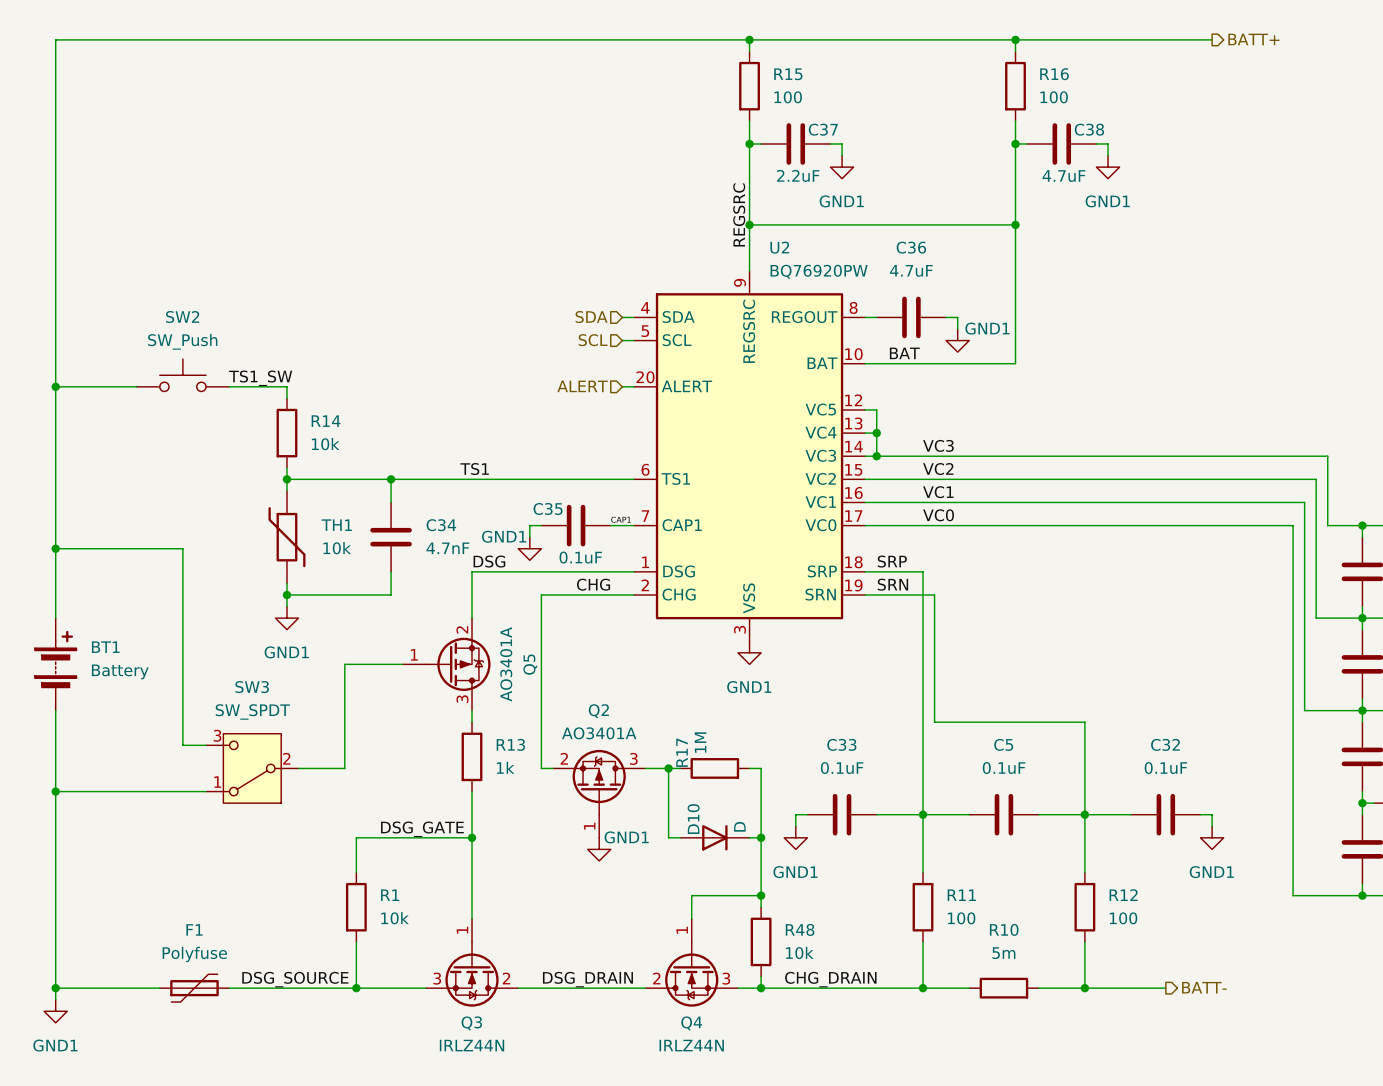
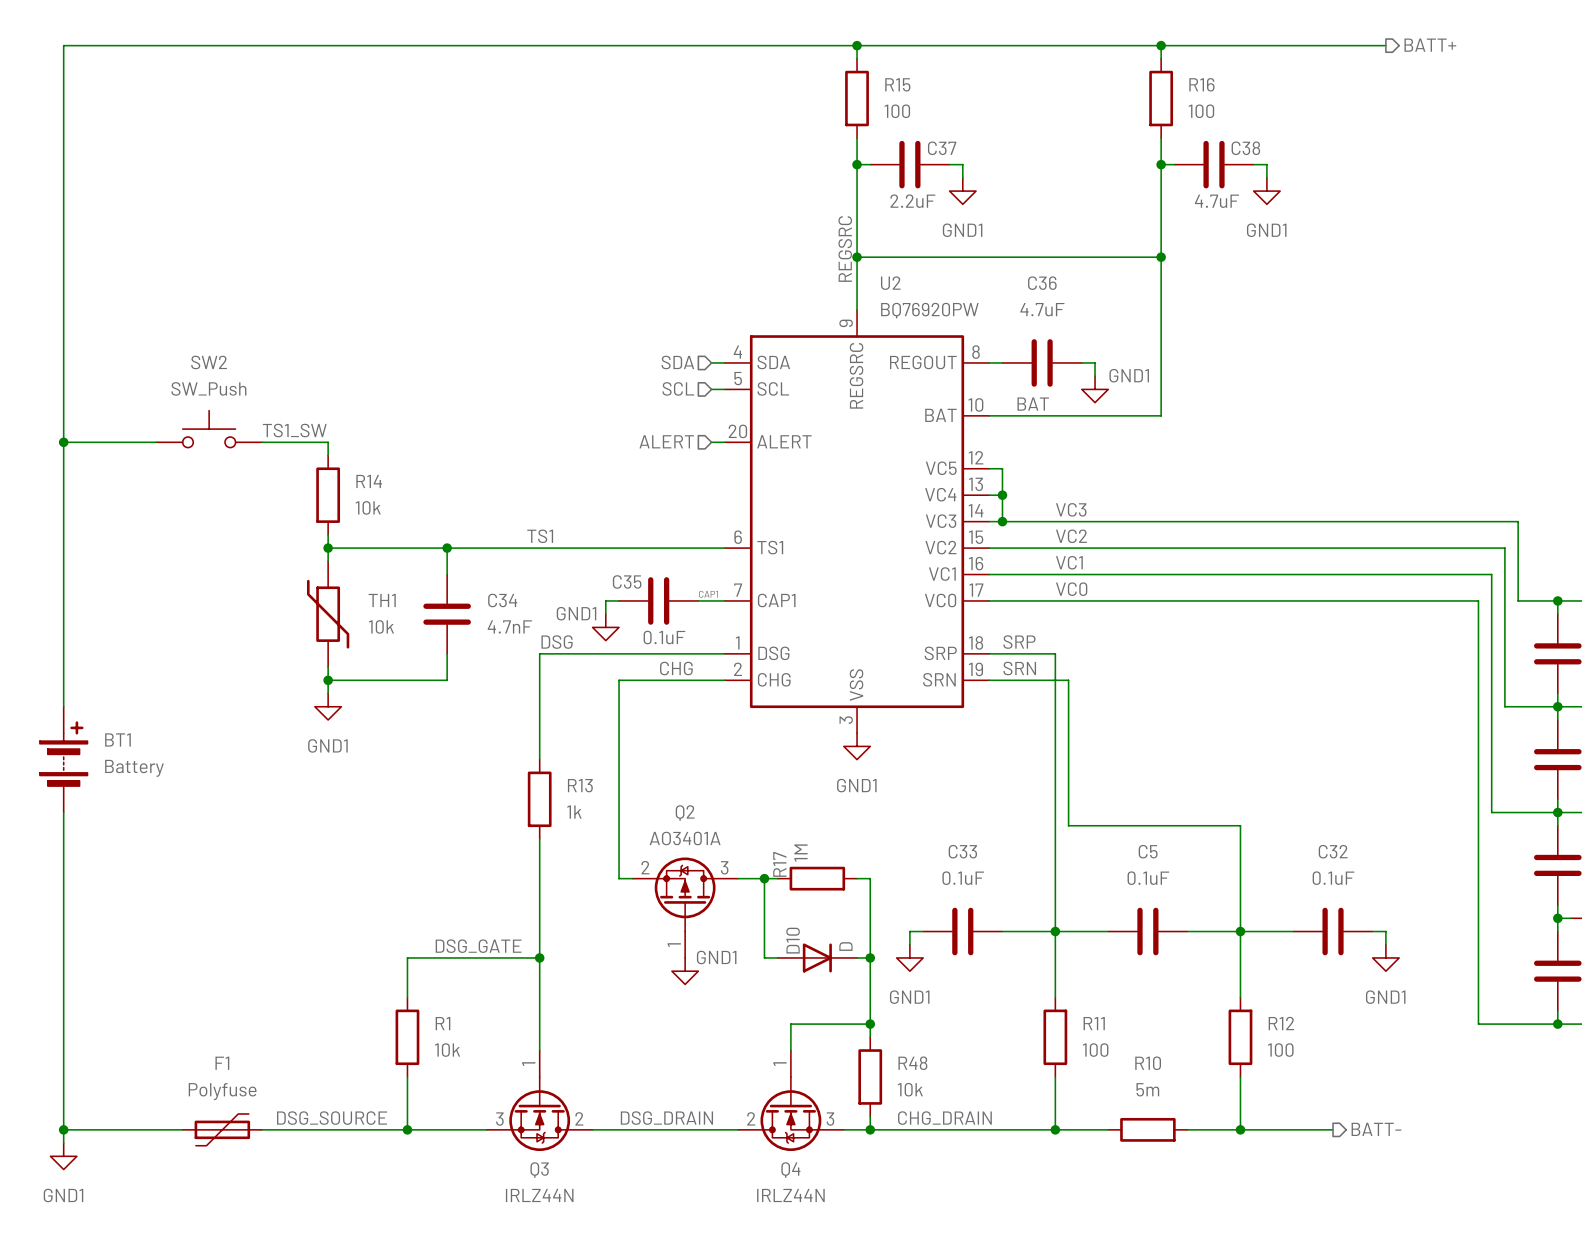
wire: (55, 548) (182, 548) (182, 745) (206, 745) -> none
junction: (55, 548) -> none
wire: (402, 664) (344, 664) (344, 768) (298, 768) -> none
Q5: AO3401A (446, 664) -> none
wire: (472, 710) (472, 722) -> none
wire: none -> (539, 838) (539, 905)
R13 position: (472, 756) -> (539, 799)
SW3: SW_SPDT (252, 768) -> none
wire: (55, 791) (206, 791) -> none
junction: (55, 791) -> none

